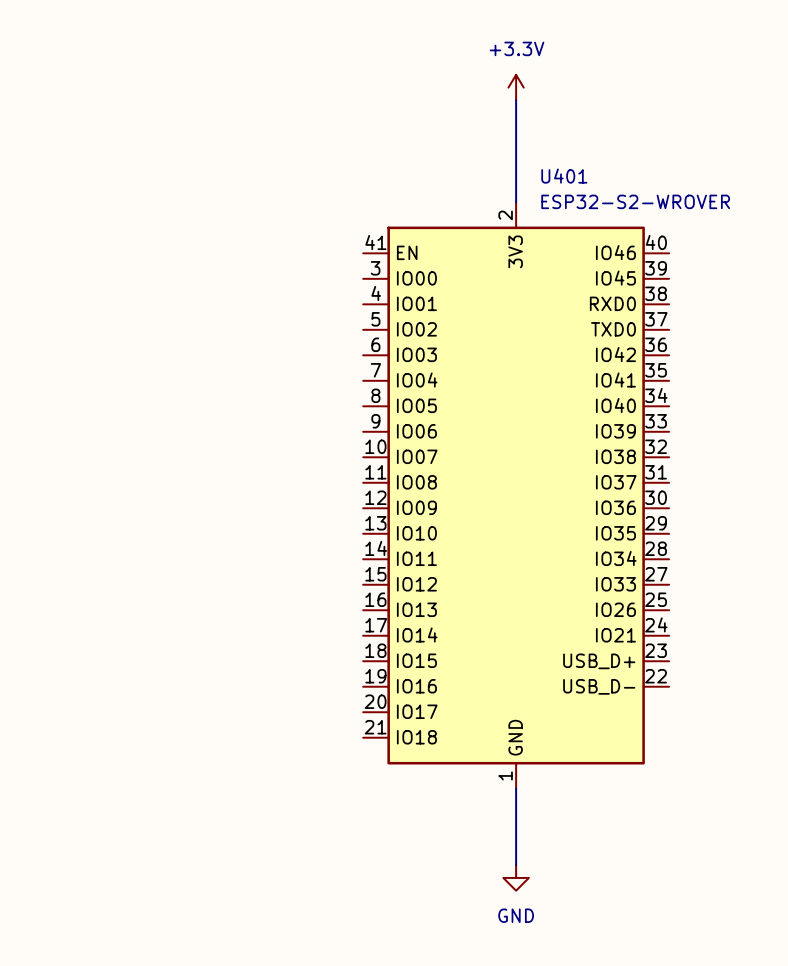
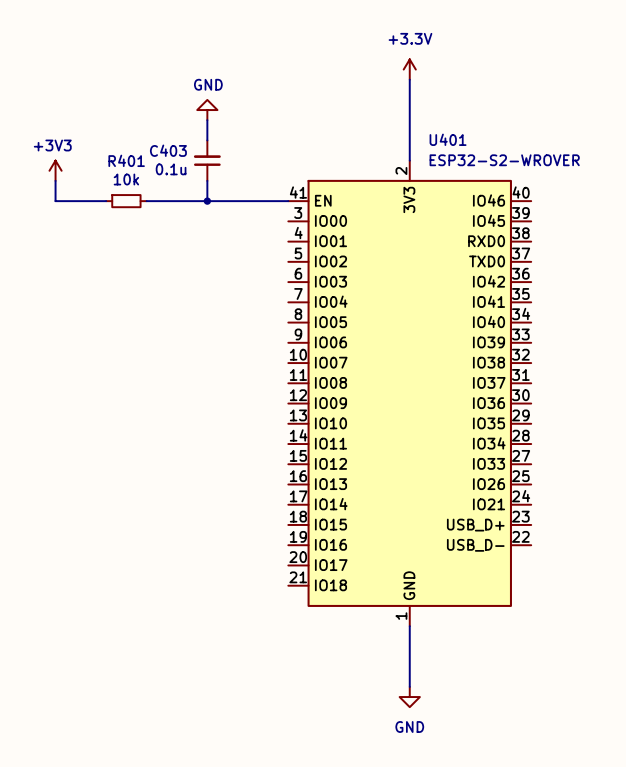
power symbol: none -> GND (207, 110)
wire: none -> (207, 120) (207, 140)
C403: none -> 0.1u (207, 160)
power symbol: none -> +3V3 (55, 170)
wire: none -> (55, 180) (55, 201) (106, 201)
wire: none -> (207, 180) (207, 201)
R401: none -> 10k (126, 201)
wire: none -> (146, 201) (288, 201)
junction: none -> (207, 201)

